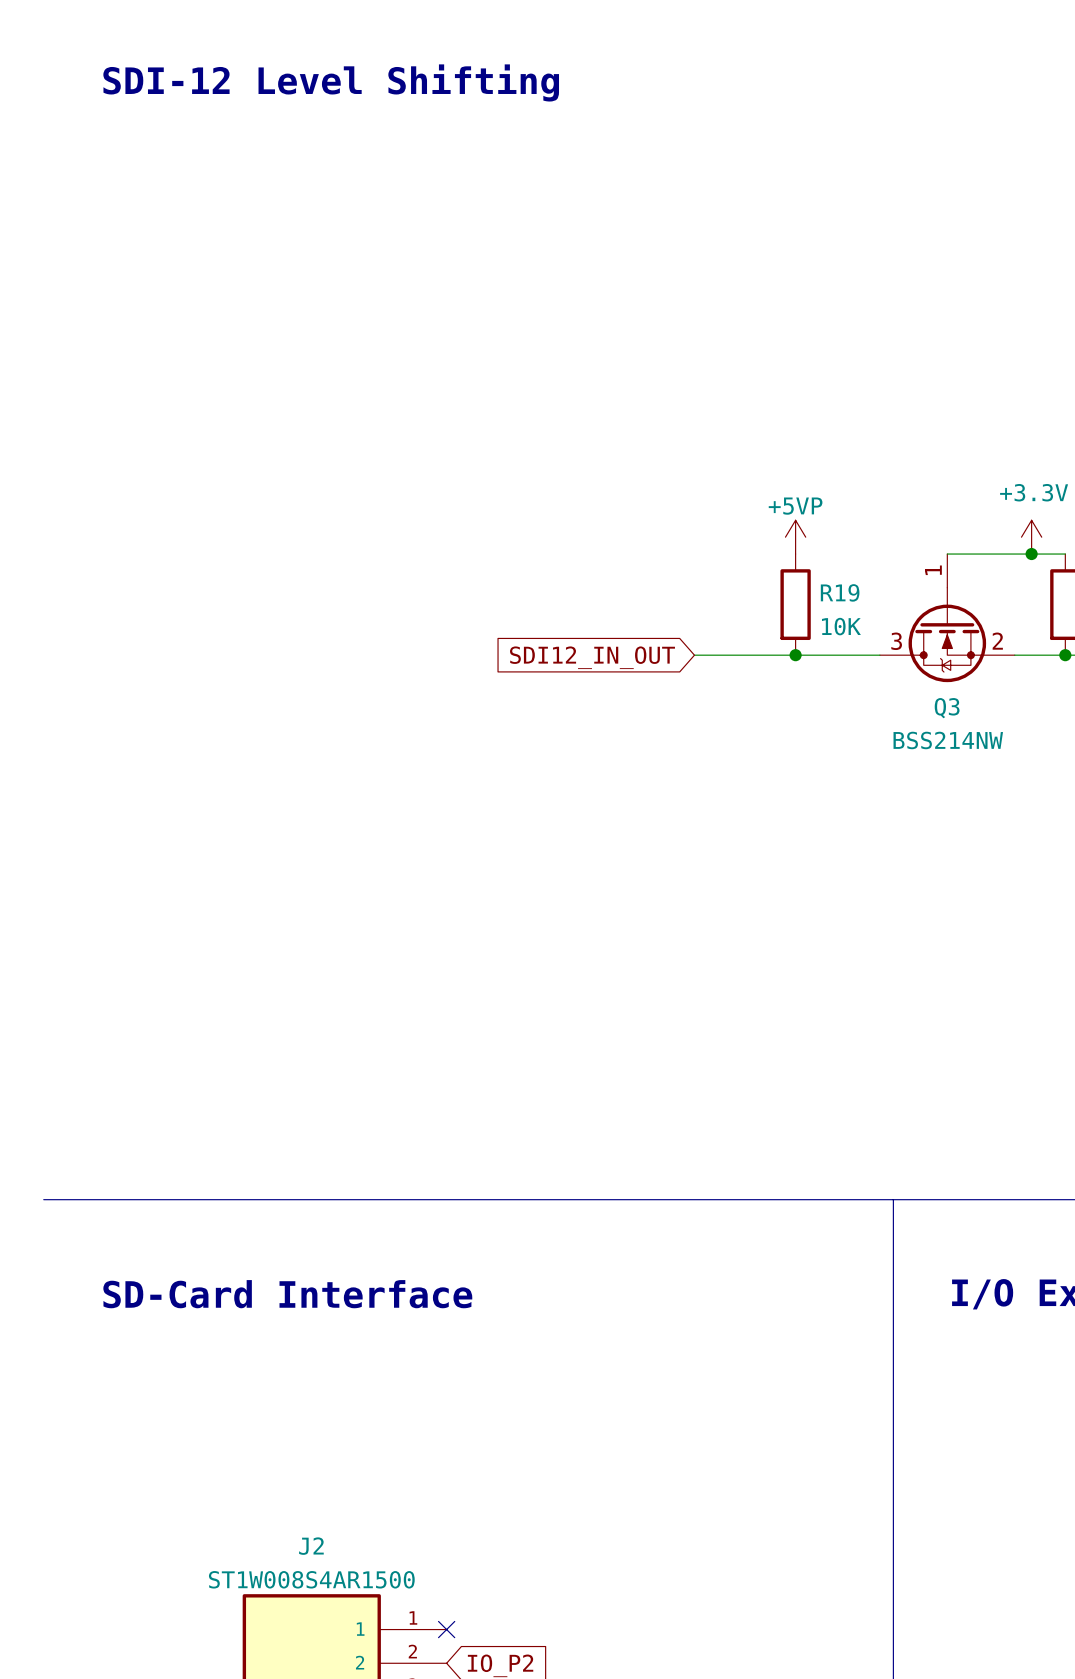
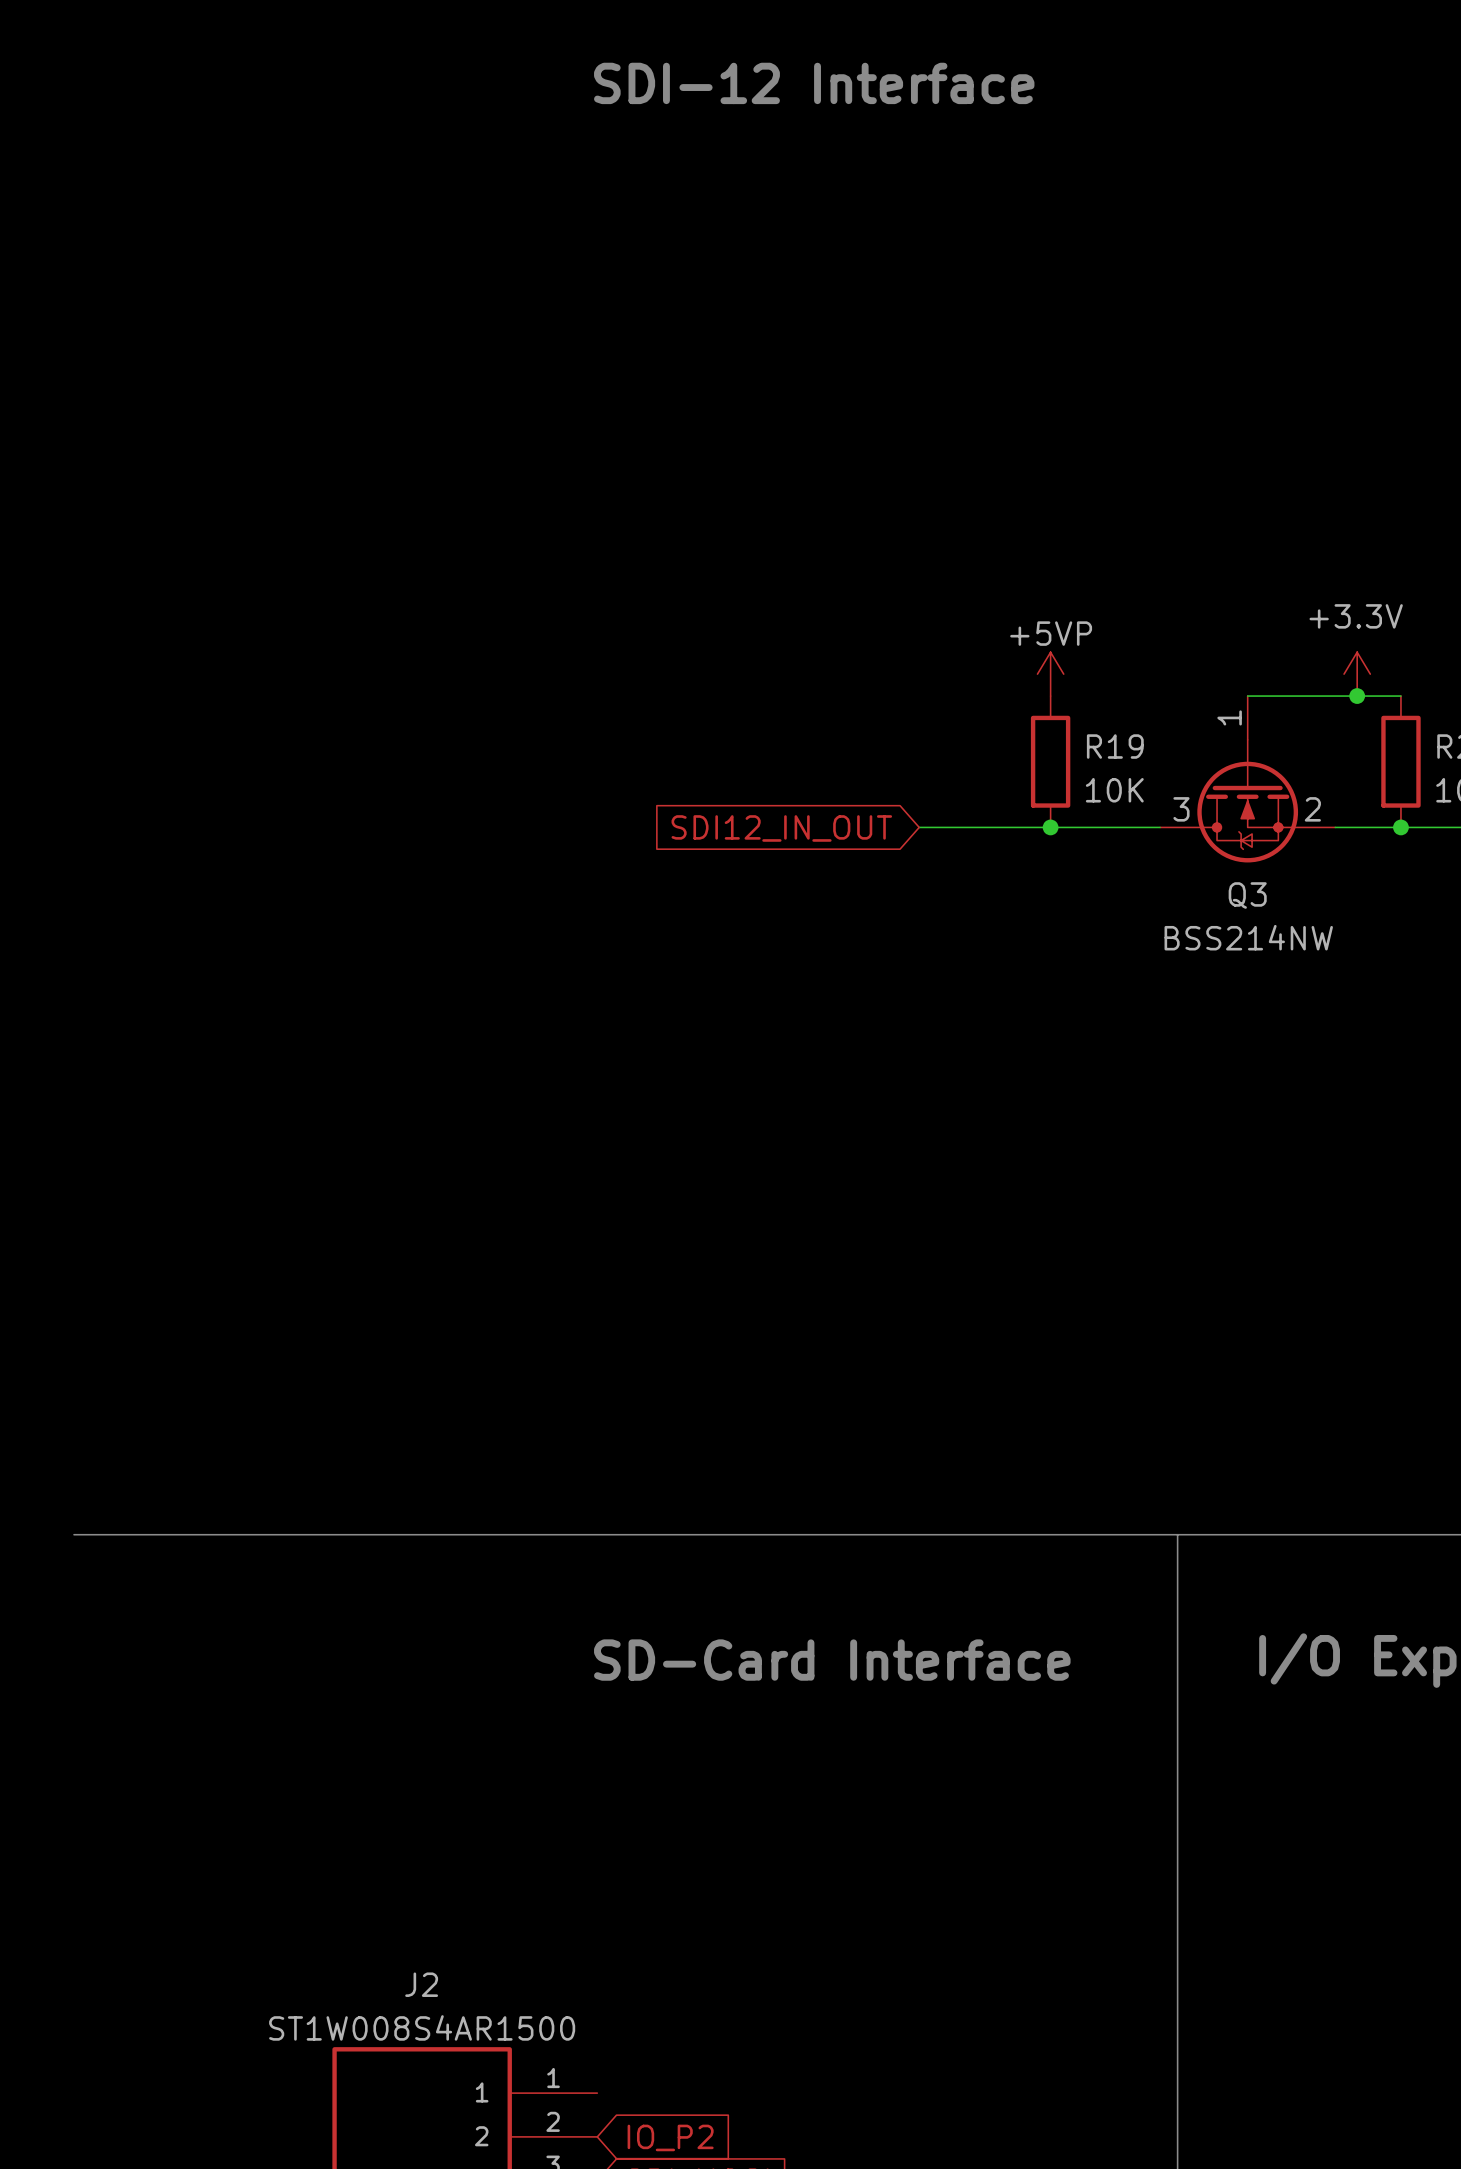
text: SDI-12 Level Shifting (331, 82) -> none
text: none -> SDI-12 Interface (814, 83)
text: SD-Card Interface (287, 1294) -> none
text: none -> SD-Card Interface (832, 1660)
no-connect mark: (446, 1629) -> none

